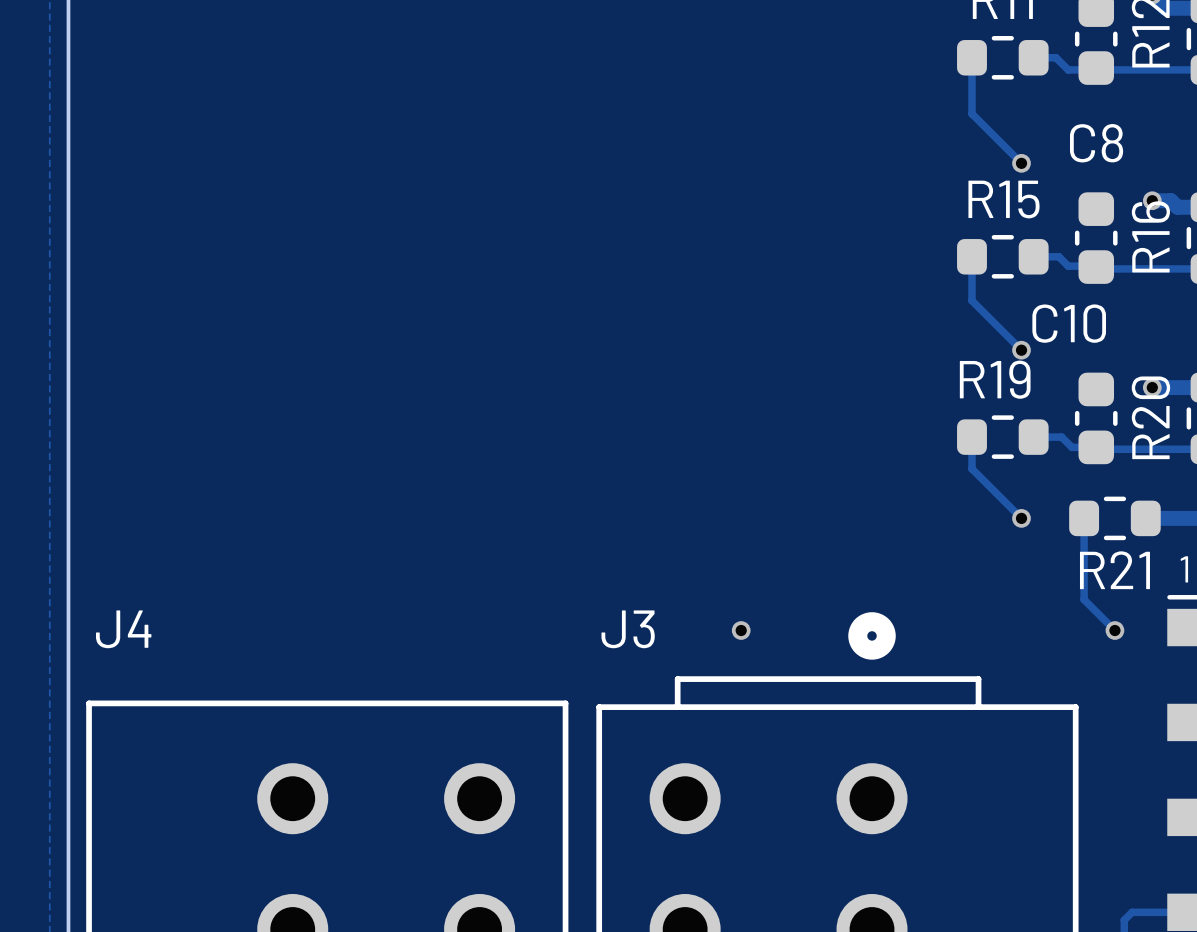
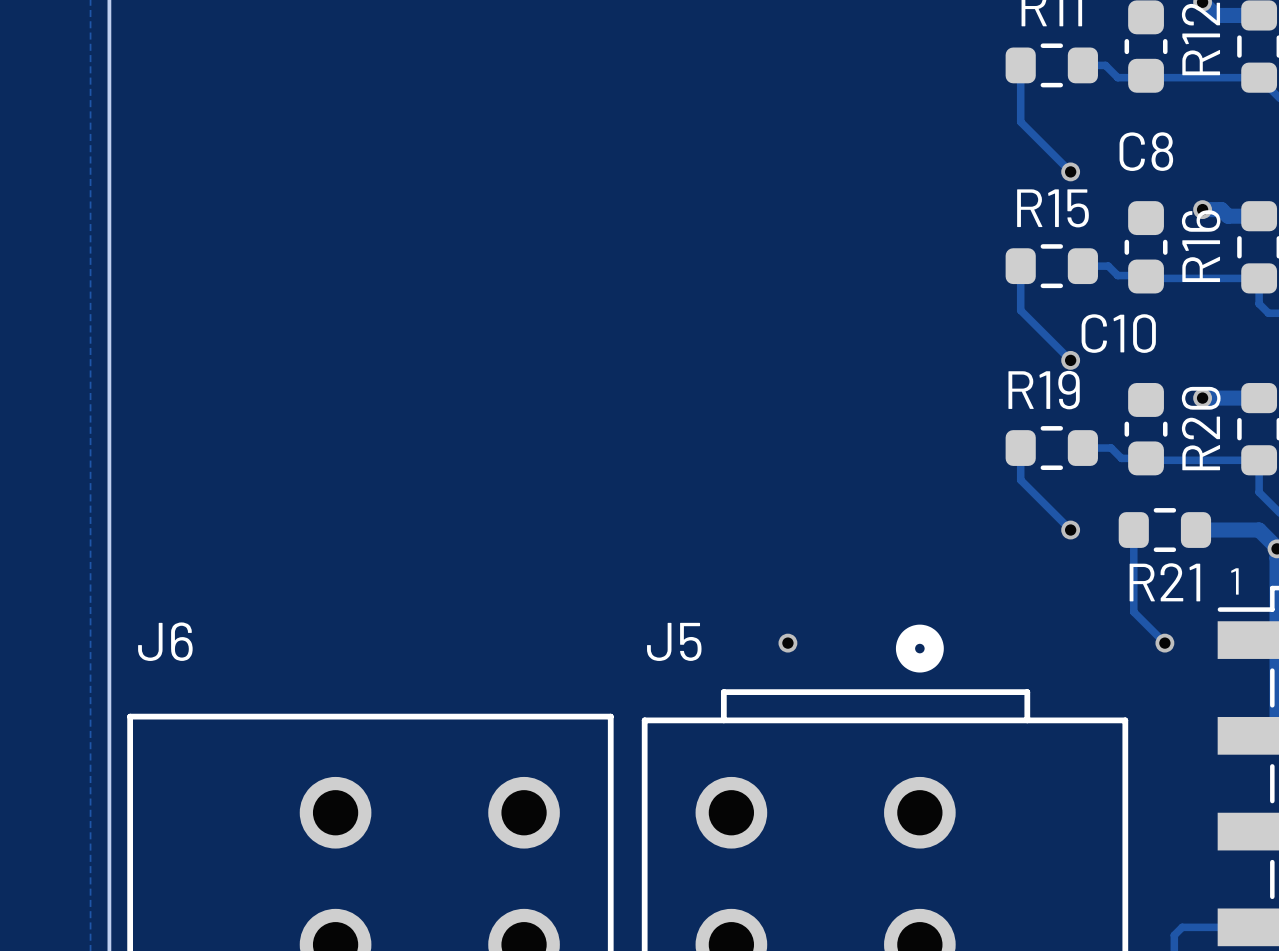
J4 name: J4 (123, 629) -> J6 (165, 641)
J3 name: J3 (628, 629) -> J5 (674, 641)

